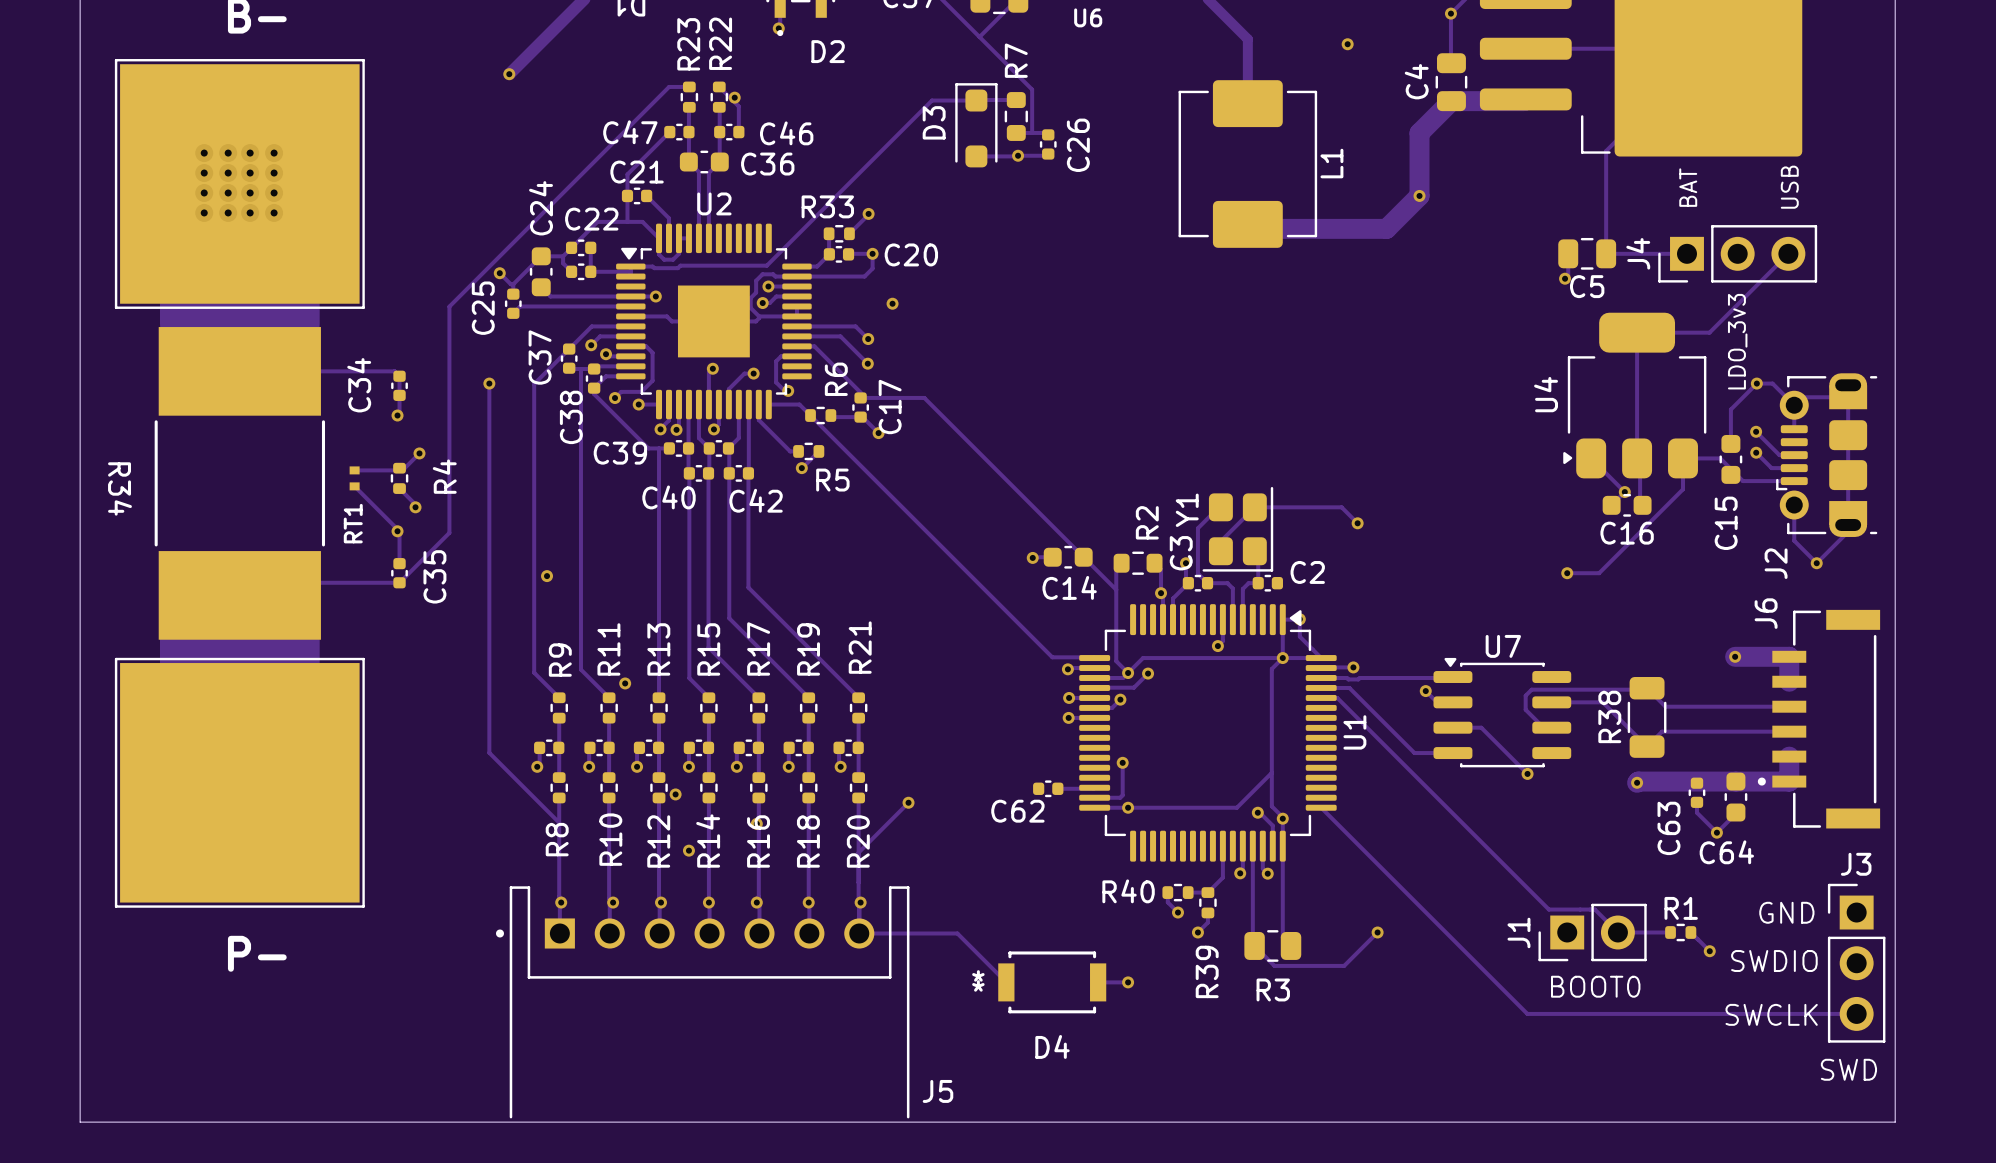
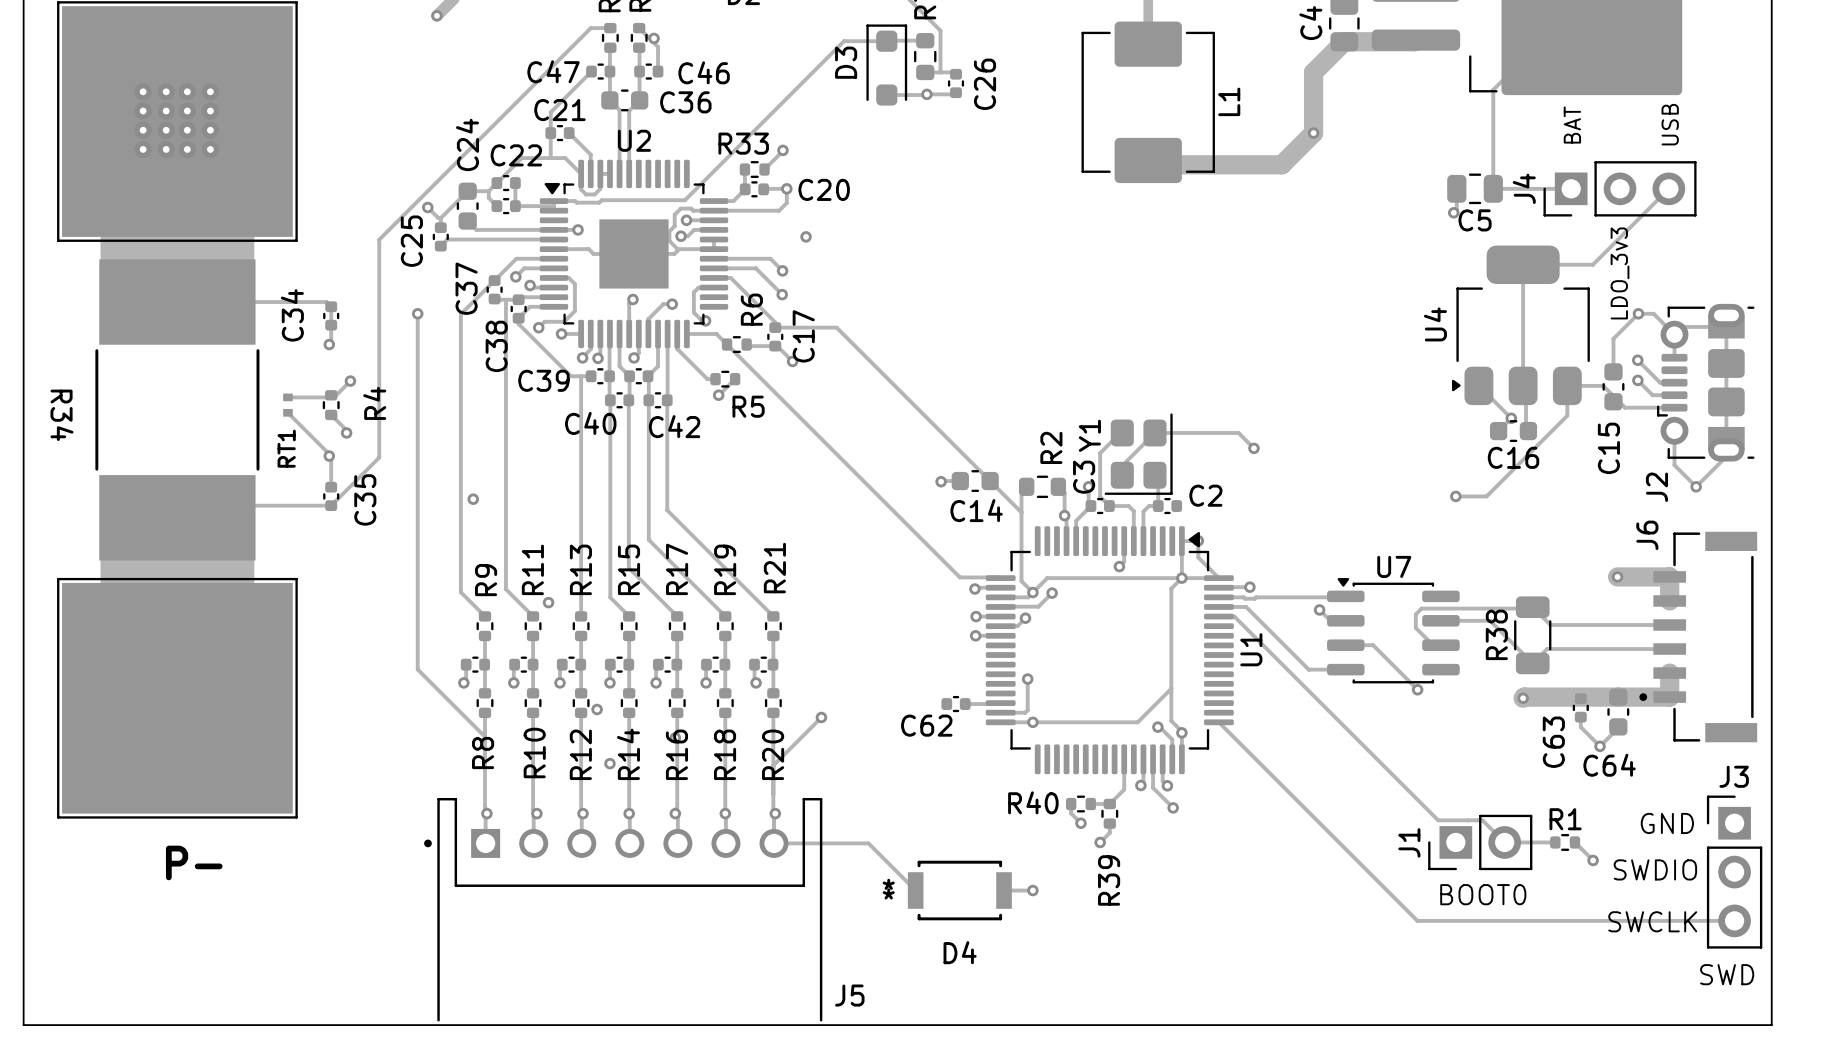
track: (1282, 846) (1282, 937) (1291, 945) -> none
track: (1252, 875) (1252, 944) (1274, 965) (1344, 965) (1377, 932) -> (1153, 787) (1173, 807)
via position: (1377, 932) -> (1173, 807)
R3: (1272, 945) -> none

